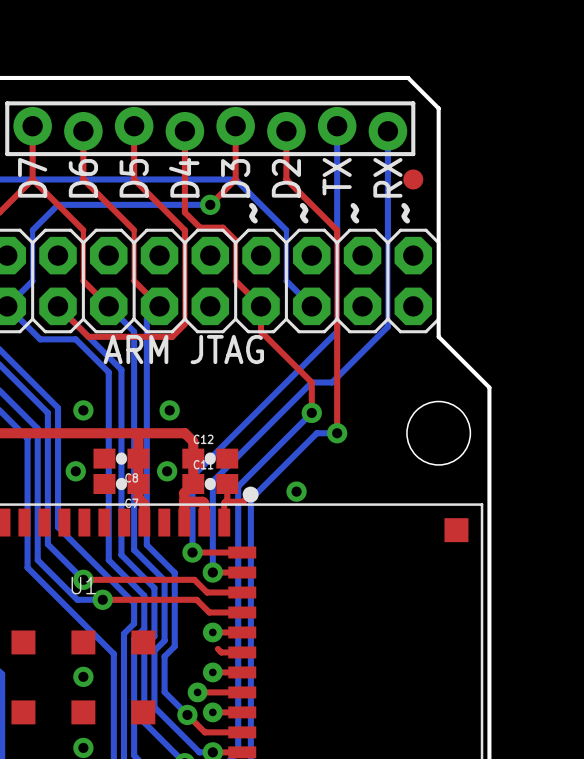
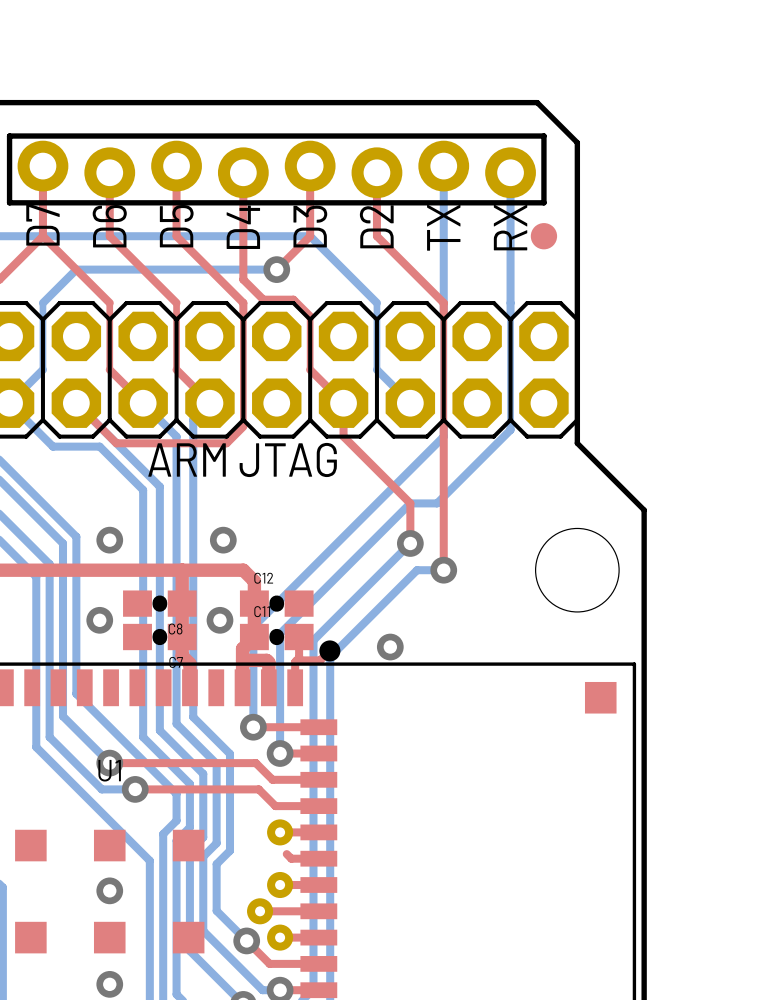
text: ~ (253, 213) -> none
text: ~ (304, 213) -> none
text: ~ (354, 213) -> none
text: ~ (405, 213) -> none

